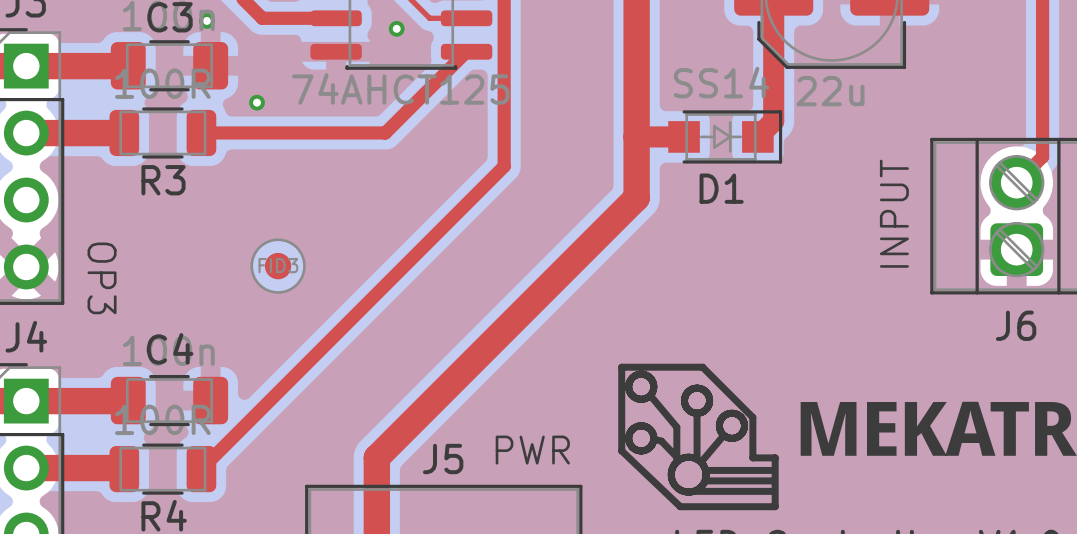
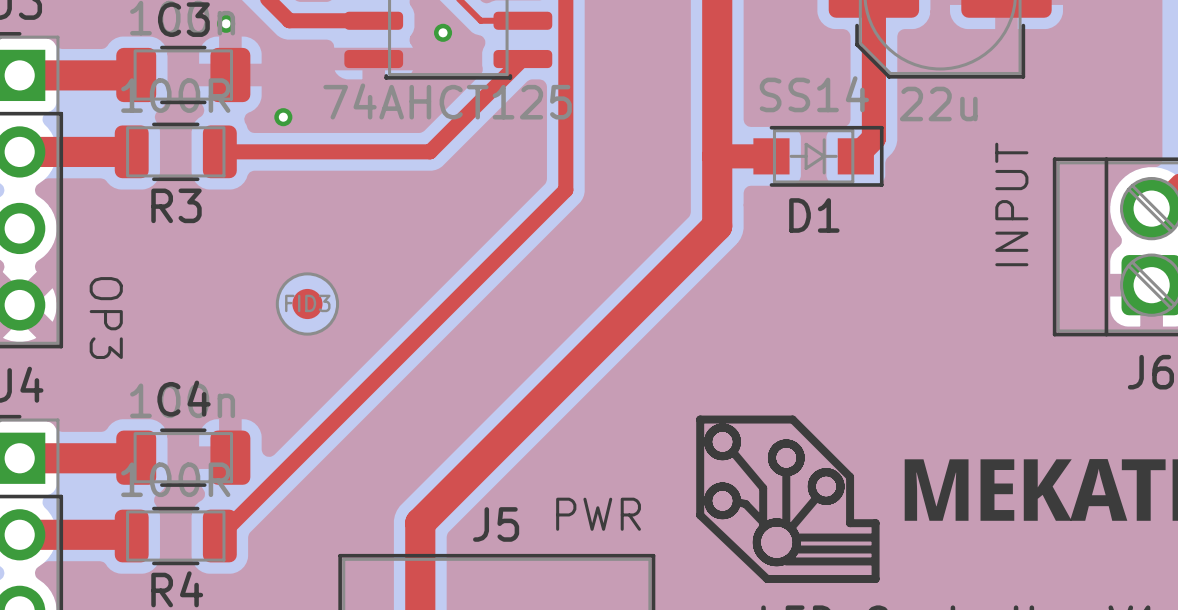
text position: INPUT (894, 213) -> INPUT (1011, 204)

